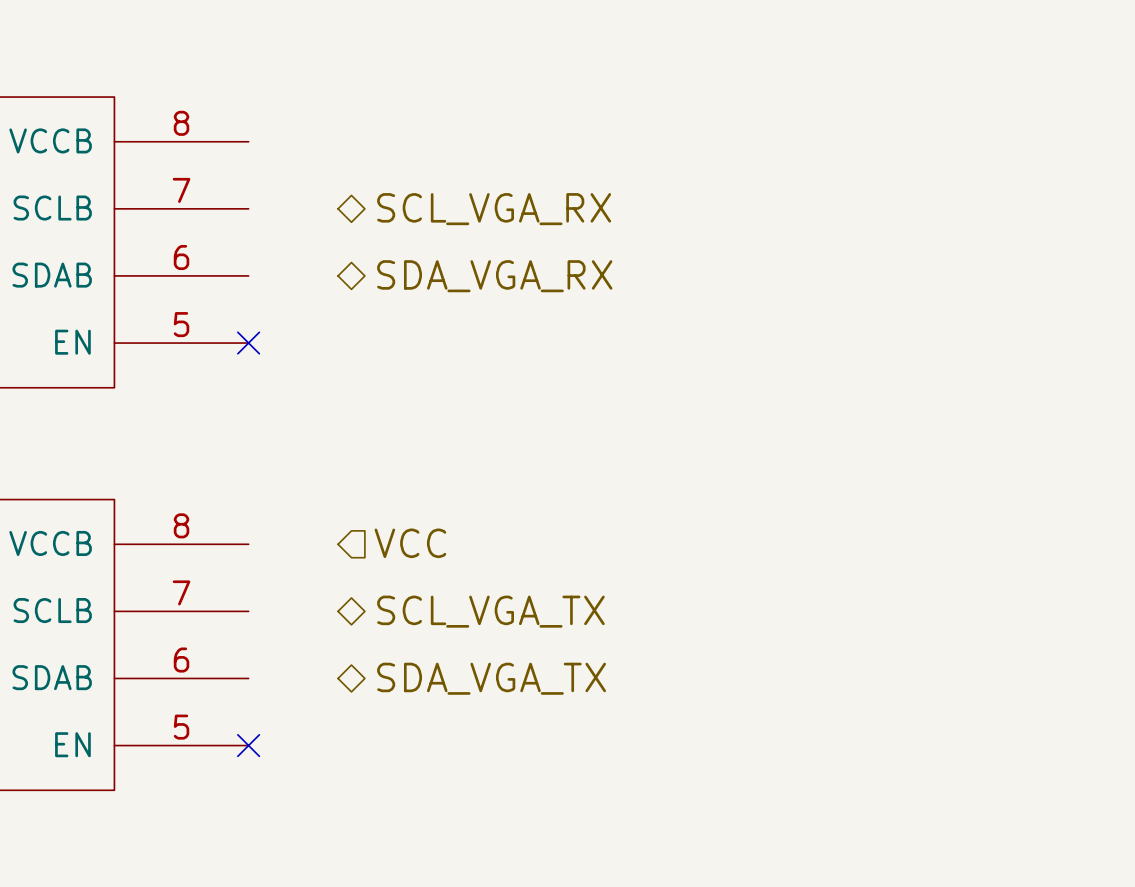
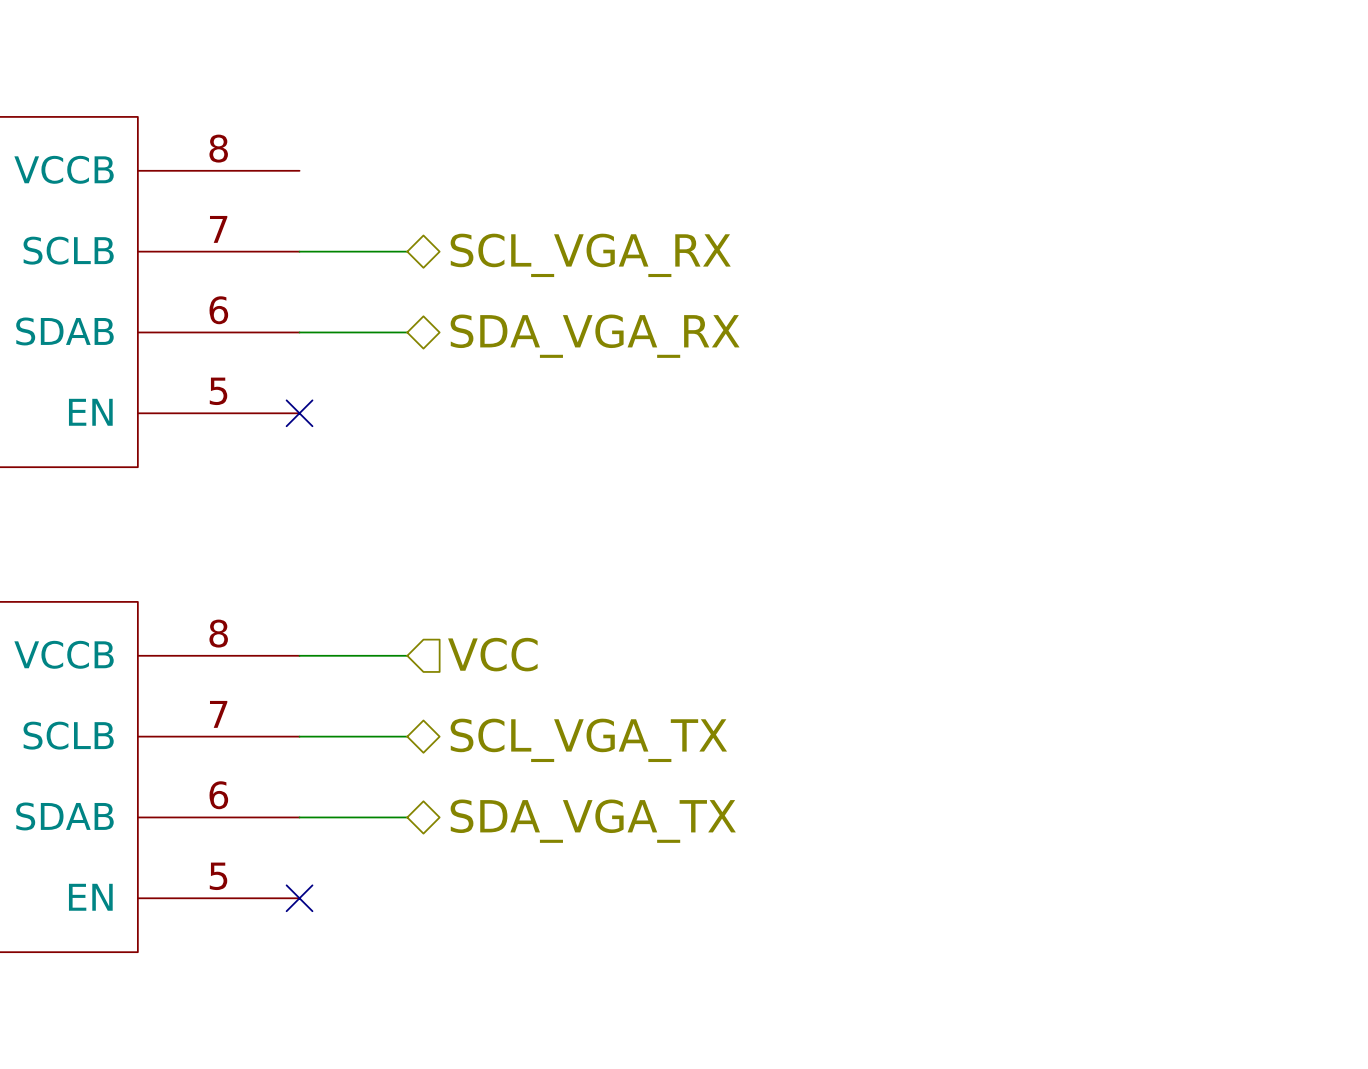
wire: none -> (299, 251) (407, 251)
wire: none -> (299, 332) (407, 332)
wire: none -> (299, 655) (407, 655)
wire: none -> (299, 736) (407, 736)
wire: none -> (299, 817) (407, 817)

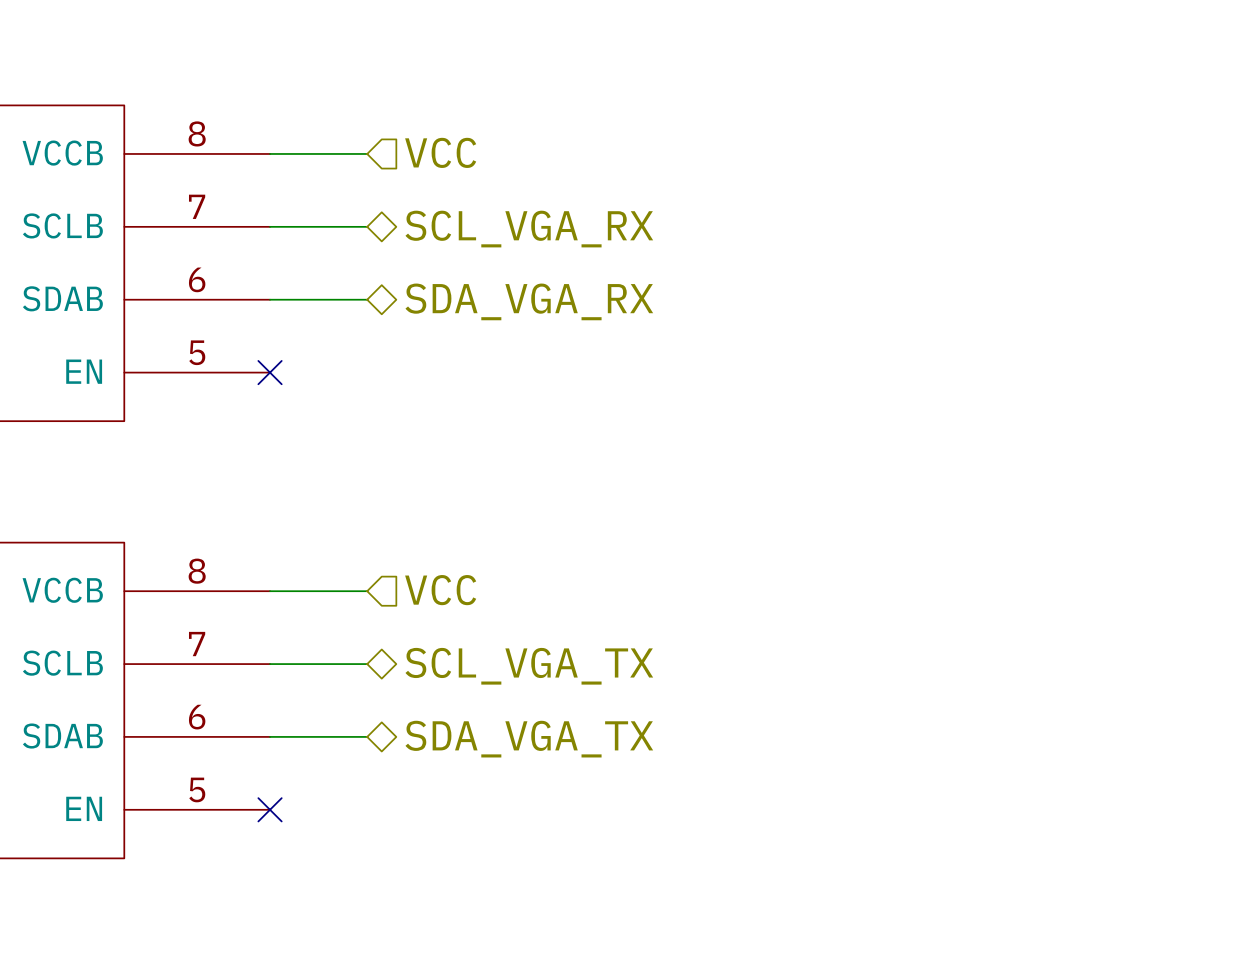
hierarchical label: none -> VCC (440, 152)
wire: none -> (270, 153) (367, 153)

